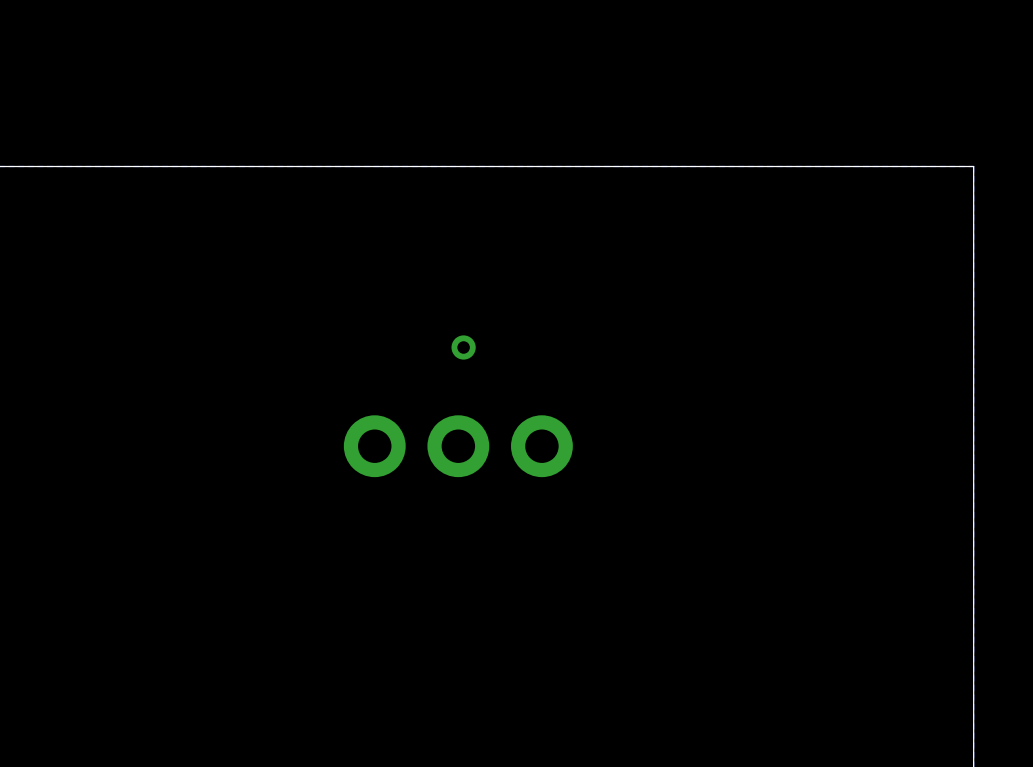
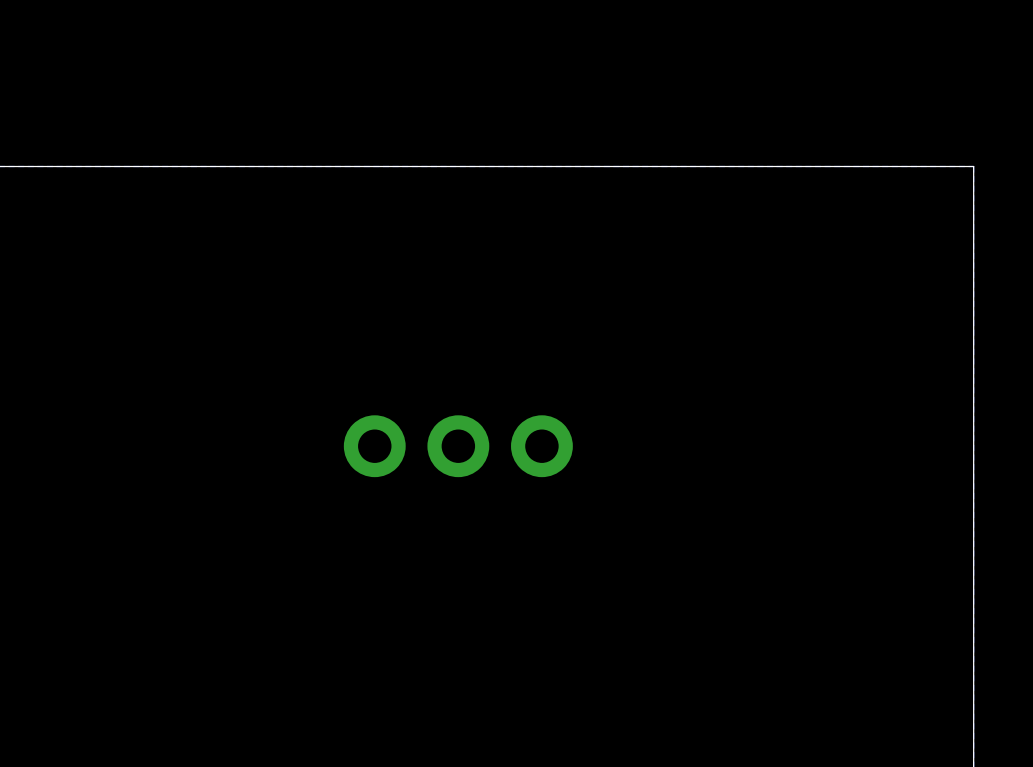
via: (463, 347) -> none

